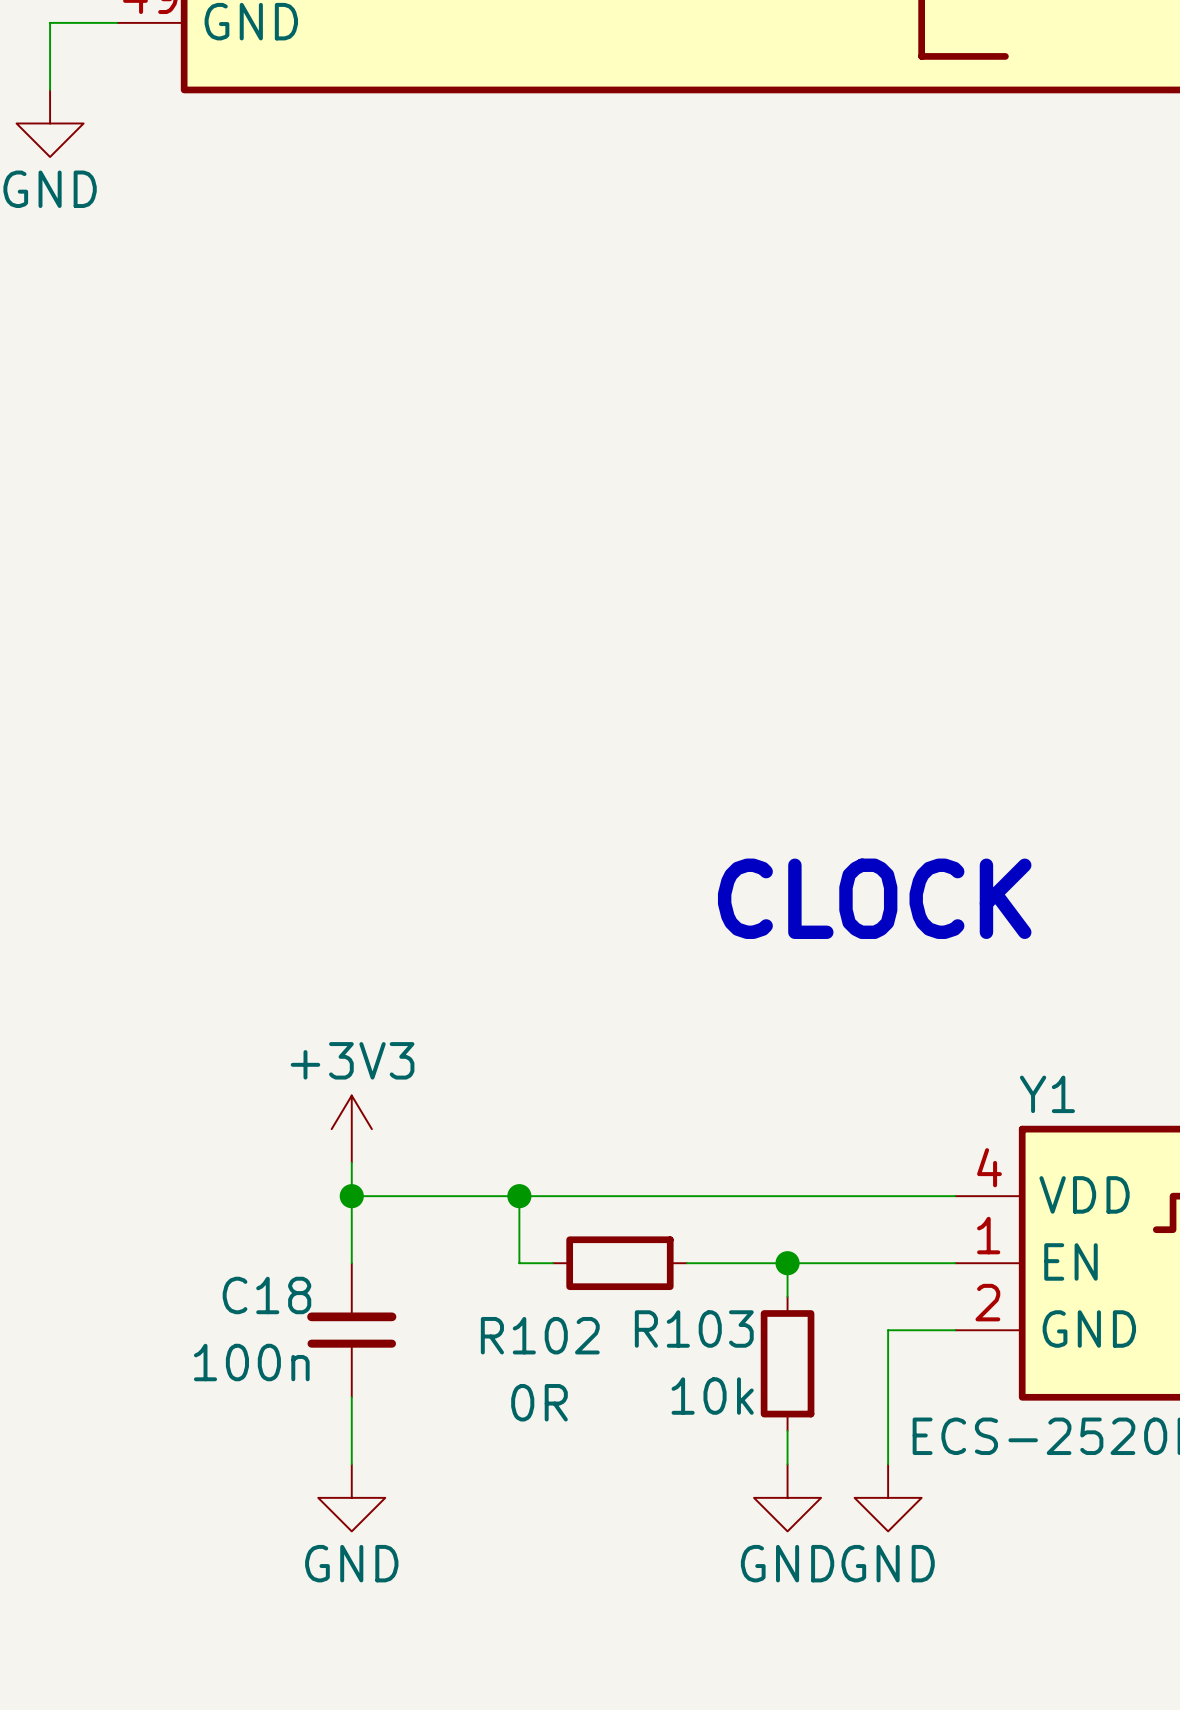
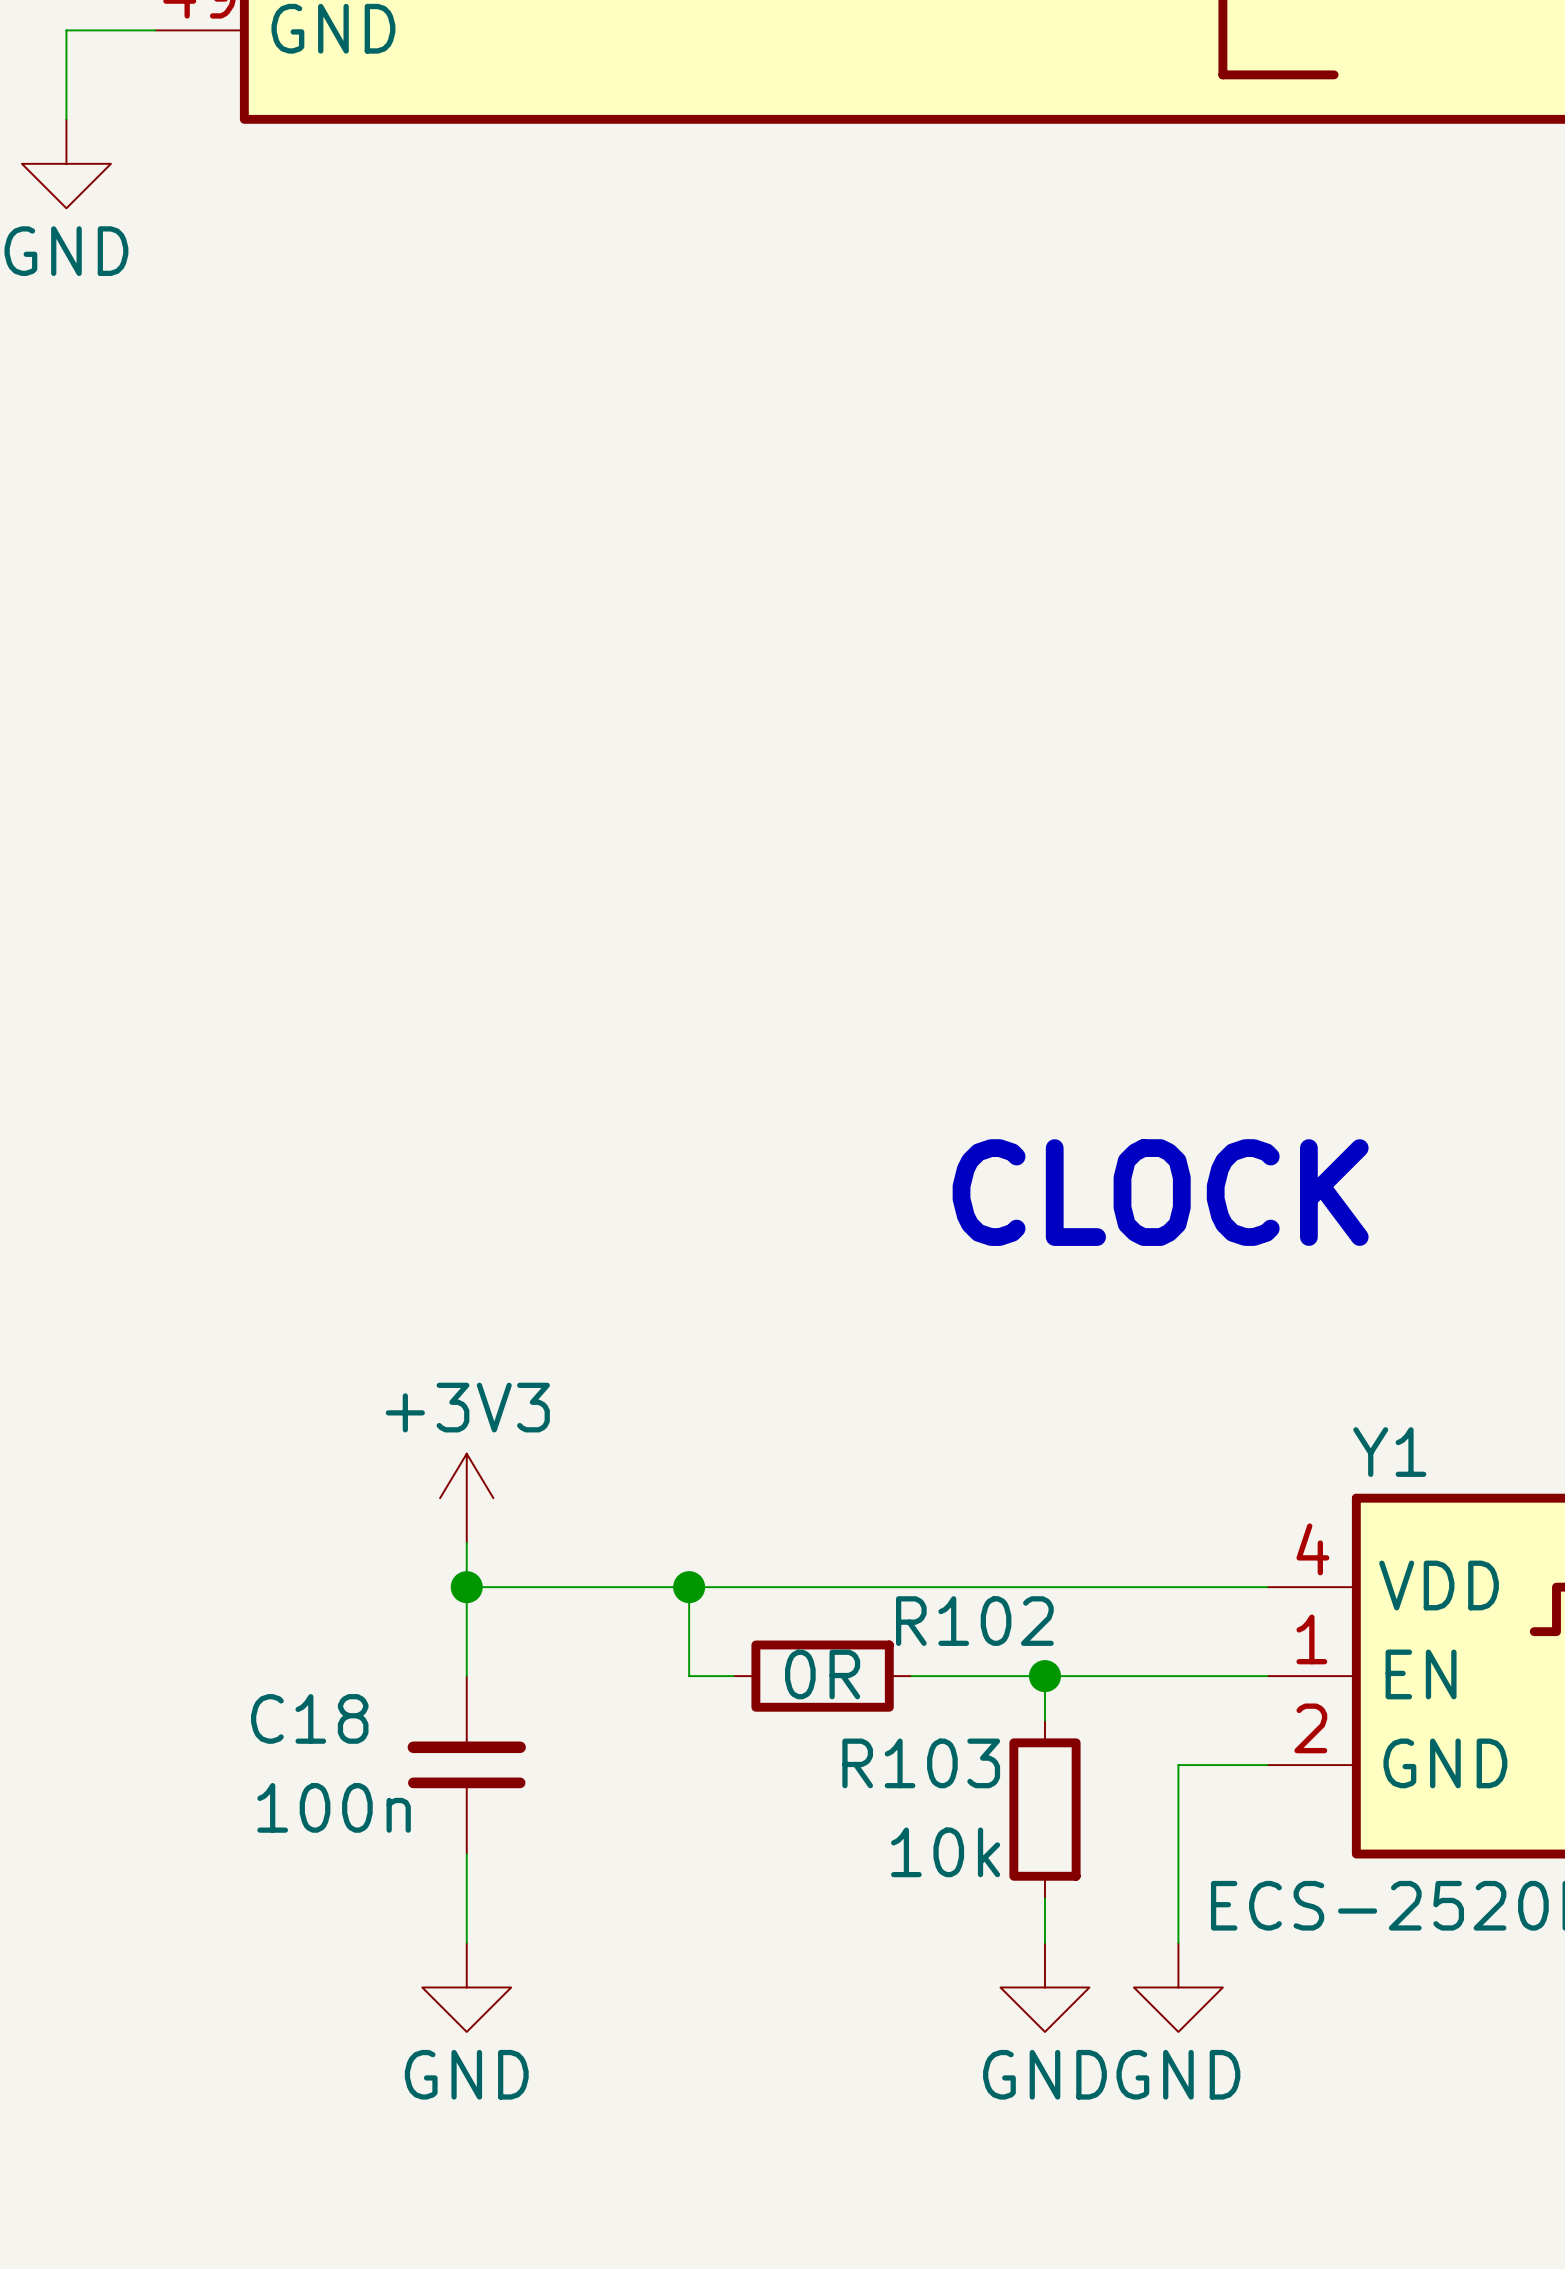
C18 name position: C18 (266, 1295) -> C18 (309, 1718)
R102 name position: R102 (540, 1335) -> R102 (974, 1621)
R102 text position: 0R (539, 1402) -> 0R (822, 1674)

